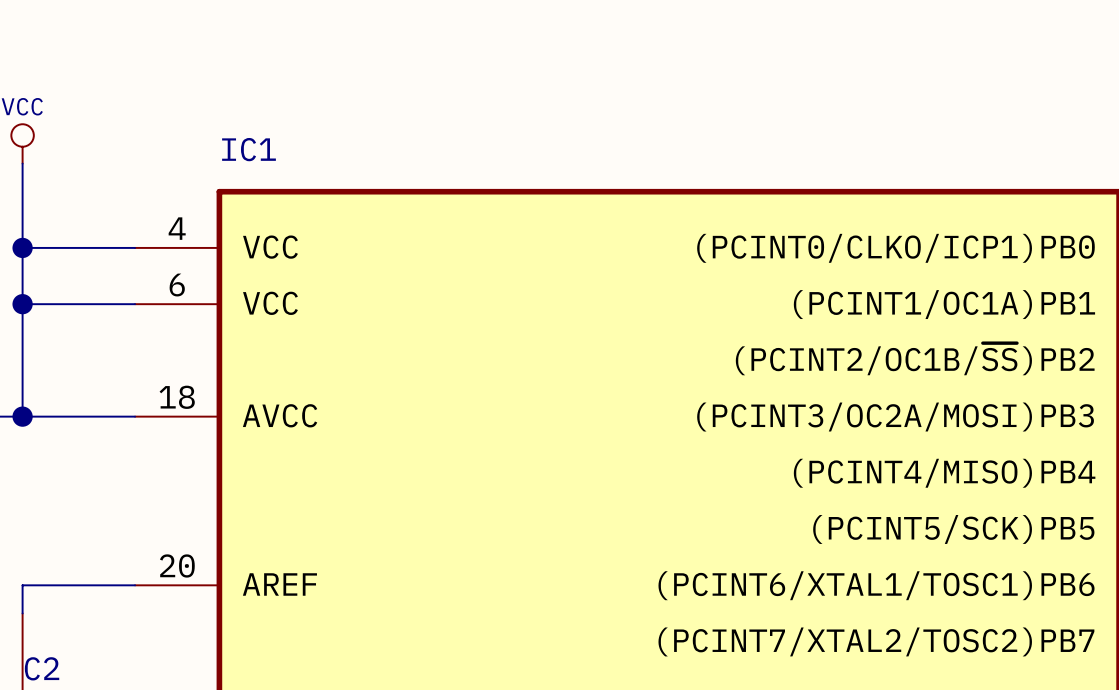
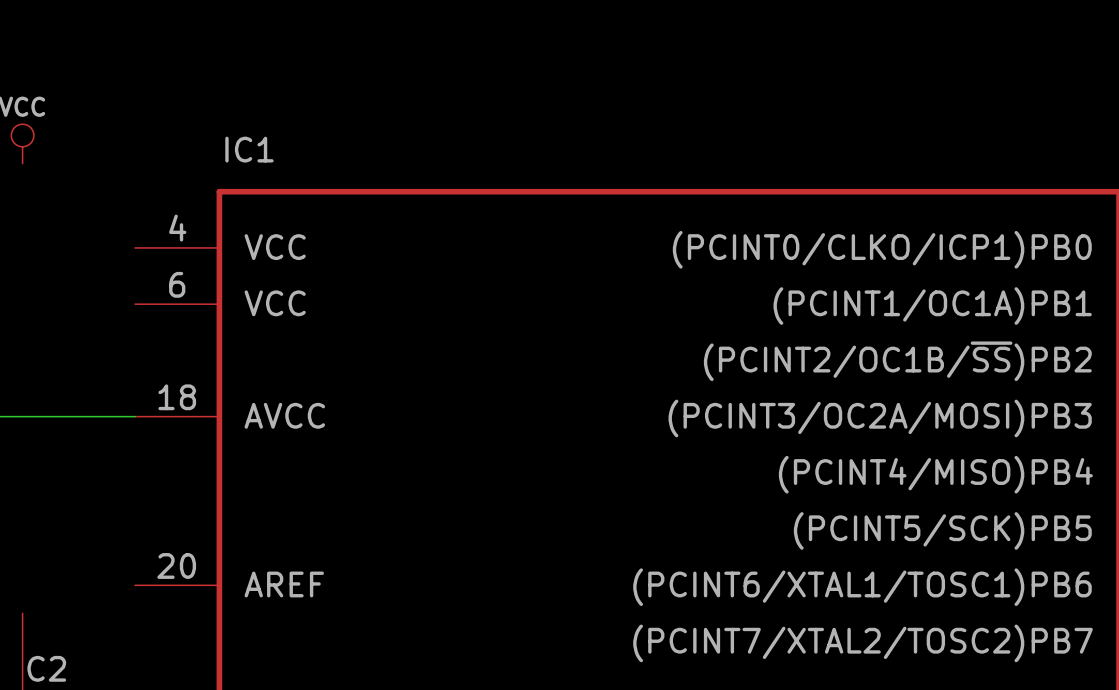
wire: (22, 163) (22, 416) -> none
wire: (22, 247) (135, 247) -> none
junction: (22, 247) -> none
wire: (22, 304) (135, 304) -> none
junction: (22, 304) -> none
junction: (22, 416) -> none
wire: (135, 585) (22, 585) (22, 613) -> none

